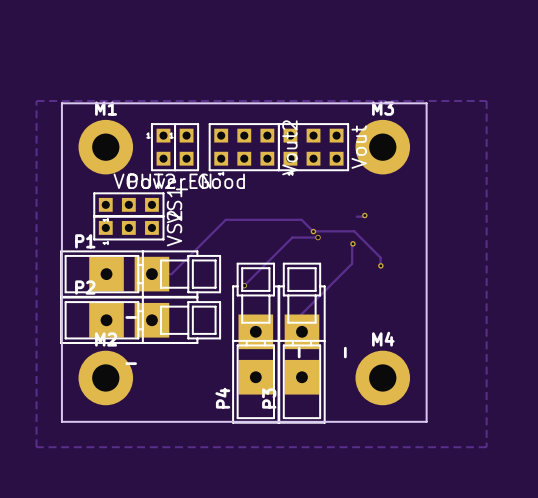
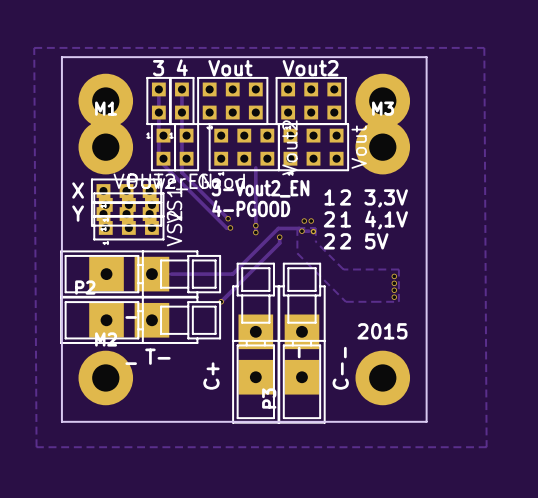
text: none -> 4 (182, 67)
text: none -> 3 (158, 68)
text: none -> Vout (230, 68)
text: none -> Vout2 (310, 68)
track: none -> (158, 89) (158, 160) (226, 227) (230, 227)
track: none -> (181, 89) (181, 172) (228, 218)
part: none -> (105, 101)
part: none -> (158, 101)
part: none -> (181, 101)
part: none -> (232, 101)
part: none -> (311, 101)
part: none -> (382, 101)
board edge: (61, 103) (426, 103) -> (61, 103) (61, 57) (426, 57) (426, 103)
track: none -> (255, 167) (255, 232)
text: none -> 3-Vout2_EN (260, 188)
text: none -> X (78, 190)
part: none -> (126, 191)
text: none -> 1 (329, 197)
text: none -> 2 (345, 197)
text: none -> 3,3V (386, 198)
text: none -> 4-PGOOD (251, 208)
text: none -> Y (78, 213)
part: none -> (126, 214)
track: (364, 215) (356, 216) -> none
via: (364, 215) -> none
via: none -> (228, 218)
text: none -> 2 (329, 219)
text: none -> 1 (345, 219)
text: none -> 4,1V (386, 220)
via: none -> (304, 221)
via: none -> (311, 221)
via: none -> (255, 225)
via: none -> (230, 227)
zone outline: none -> (297, 227) (315, 227) (315, 241) (343, 269) (398, 269) (398, 301) (345, 301) (297, 253) (297, 227)
via: none -> (301, 231)
via: none -> (255, 232)
track: none -> (279, 237) (279, 243) (221, 301)
via: none -> (279, 237)
track: (318, 237) (292, 237) (244, 285) -> none
via: (318, 237) -> none
P1 name: P1 (85, 241) -> none
text: none -> 2 (329, 241)
text: none -> 2 (345, 241)
text: none -> 5V (376, 241)
track: (352, 243) (352, 263) (300, 315) -> none
via: (352, 243) -> none
track: (380, 265) (380, 257) (354, 231) (313, 231) (301, 219) (225, 219) (171, 274) -> (308, 231) (301, 231) (299, 228) (278, 228) (232, 274) (171, 274)
via: (380, 265) -> none
via: none -> (394, 276)
via: none -> (394, 283)
via: (244, 285) -> none
via: none -> (394, 290)
via: none -> (394, 297)
via: none -> (221, 301)
text: none -> 2015 (382, 331)
M4 name: M4 (383, 339) -> none
text: none -> T- (157, 356)
text: none -> C+ (211, 375)
text: none -> C- (340, 375)
P4 name: P4 (222, 398) -> none
zone outline: (36, 447) (36, 101) (486, 101) (486, 447) -> (36, 447) (34, 47) (484, 47) (486, 447)

